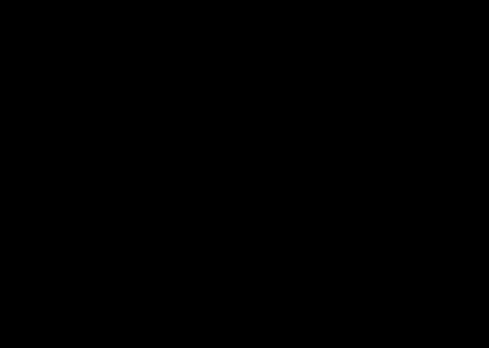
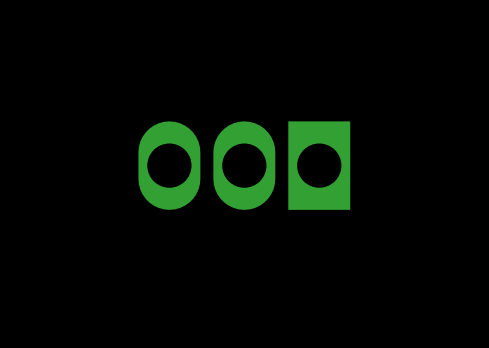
part: none -> (244, 165)

